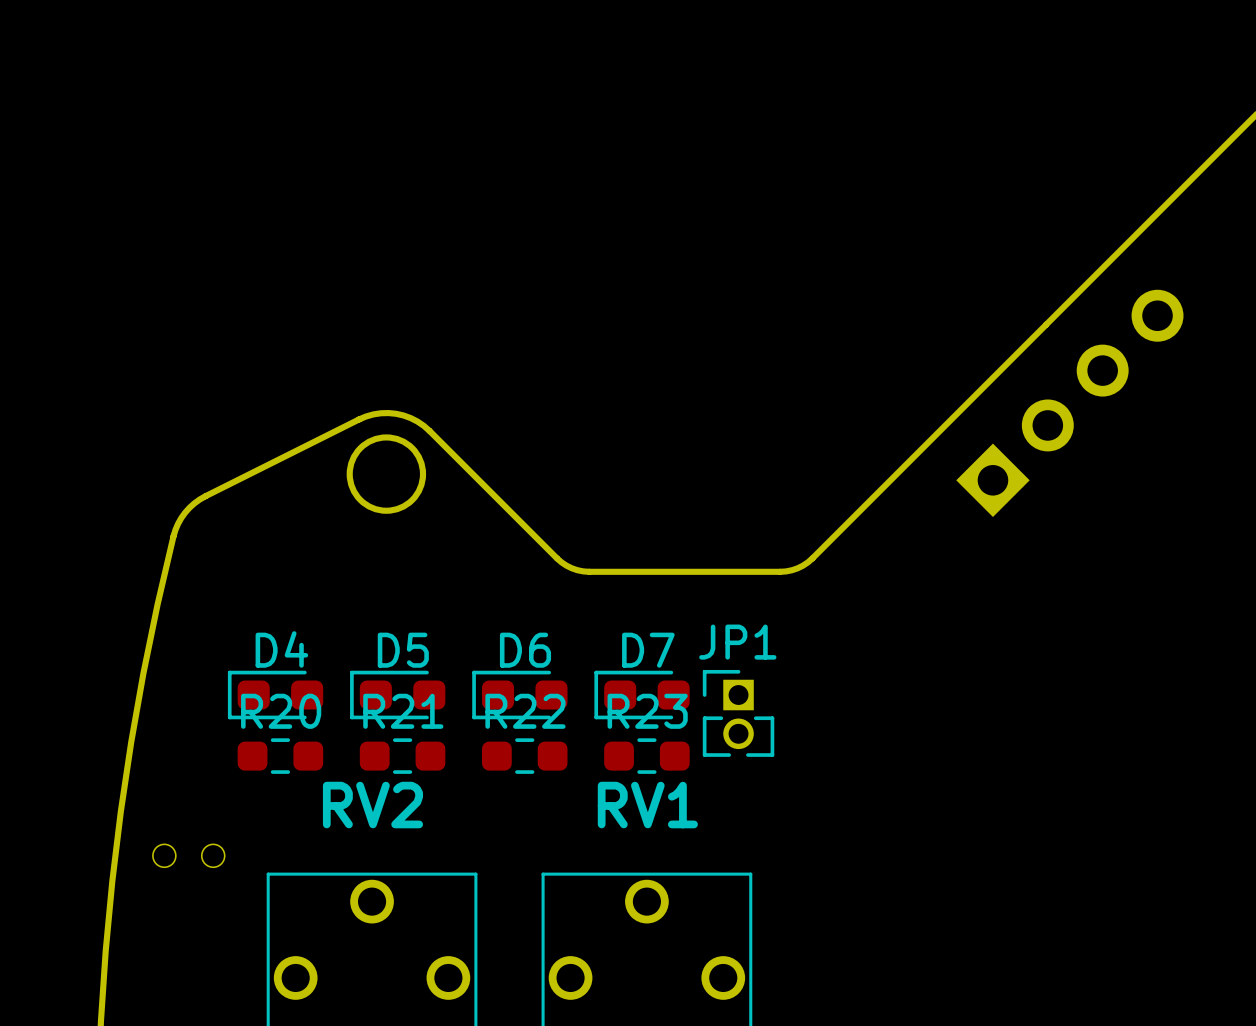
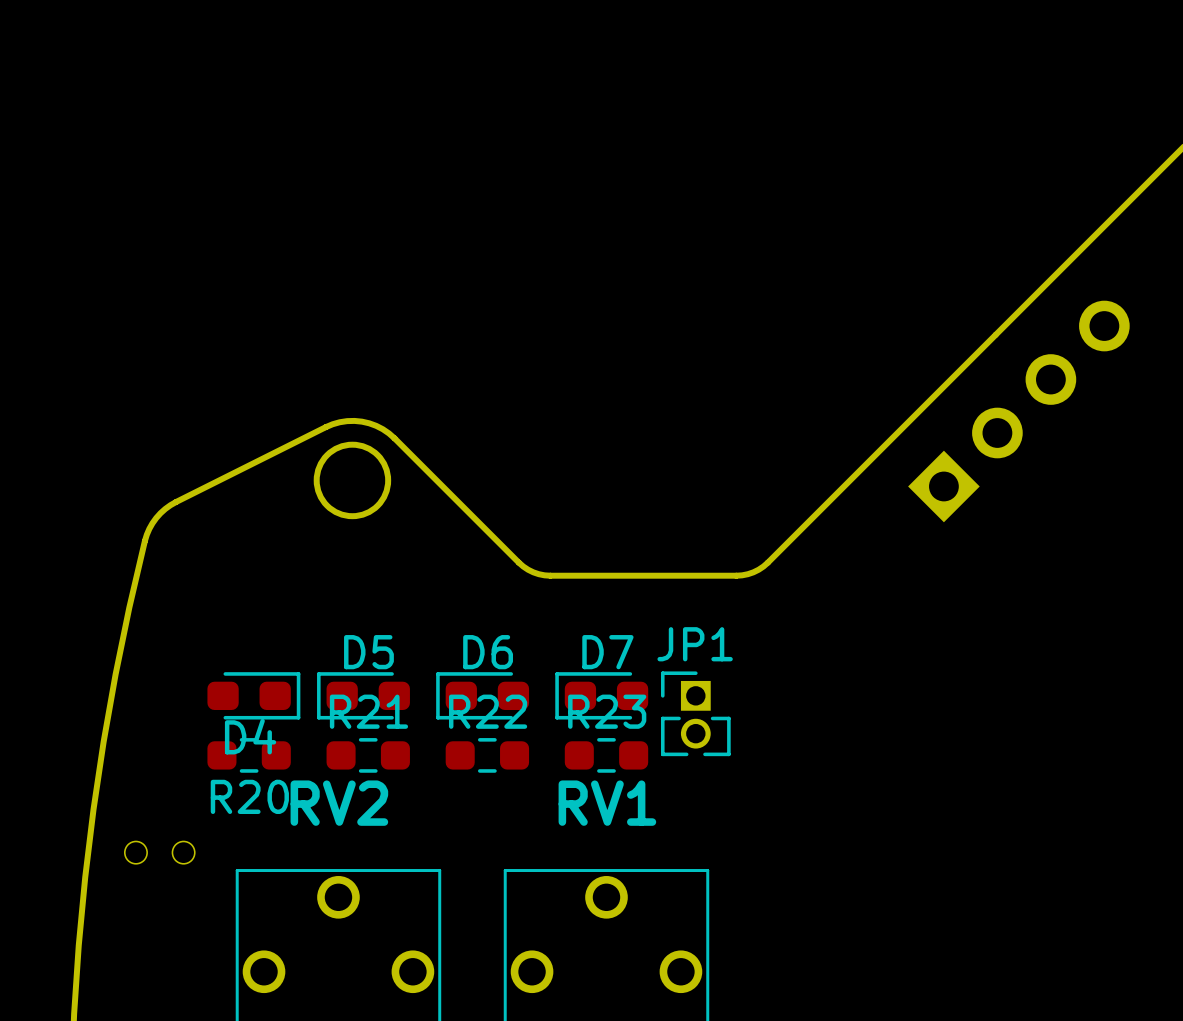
D4 rotation: 0° (275, 695) -> 180° (253, 695)
R20 name position: R20 (281, 711) -> R20 (249, 796)

